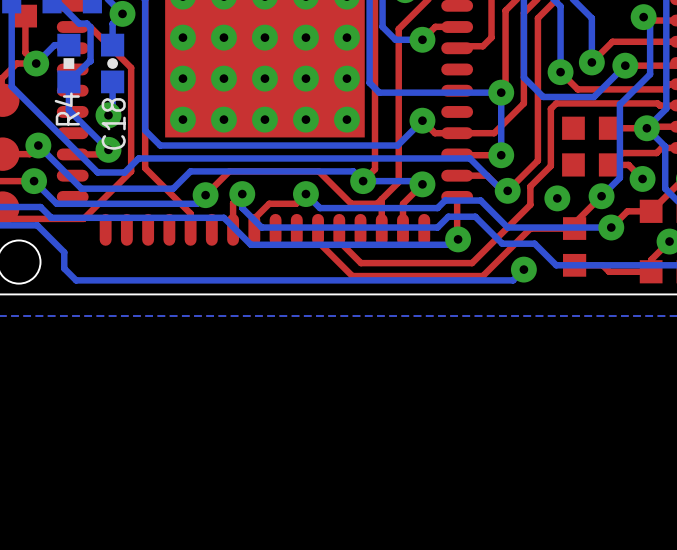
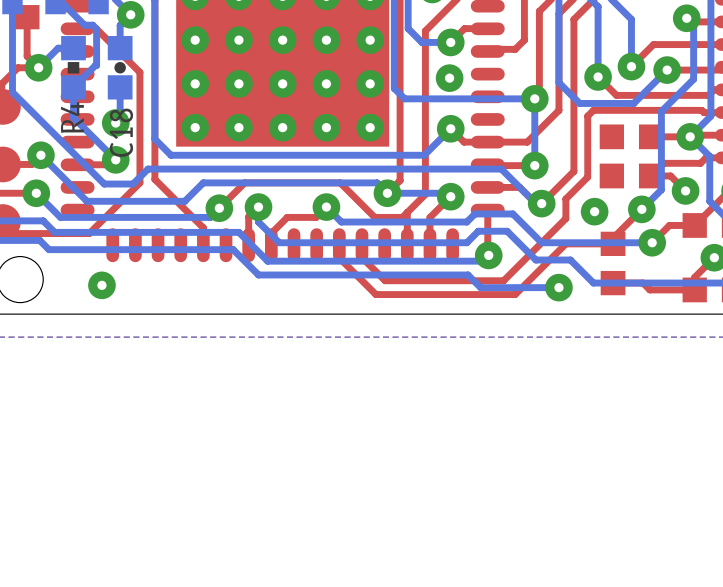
via: none -> (449, 78)
bottom track: (45, 233) (64, 252) (64, 268) (76, 280) (513, 280) (523, 269) -> (48, 249) (233, 249) (258, 274) (468, 274) (480, 287) (558, 287)
via: none -> (101, 285)

